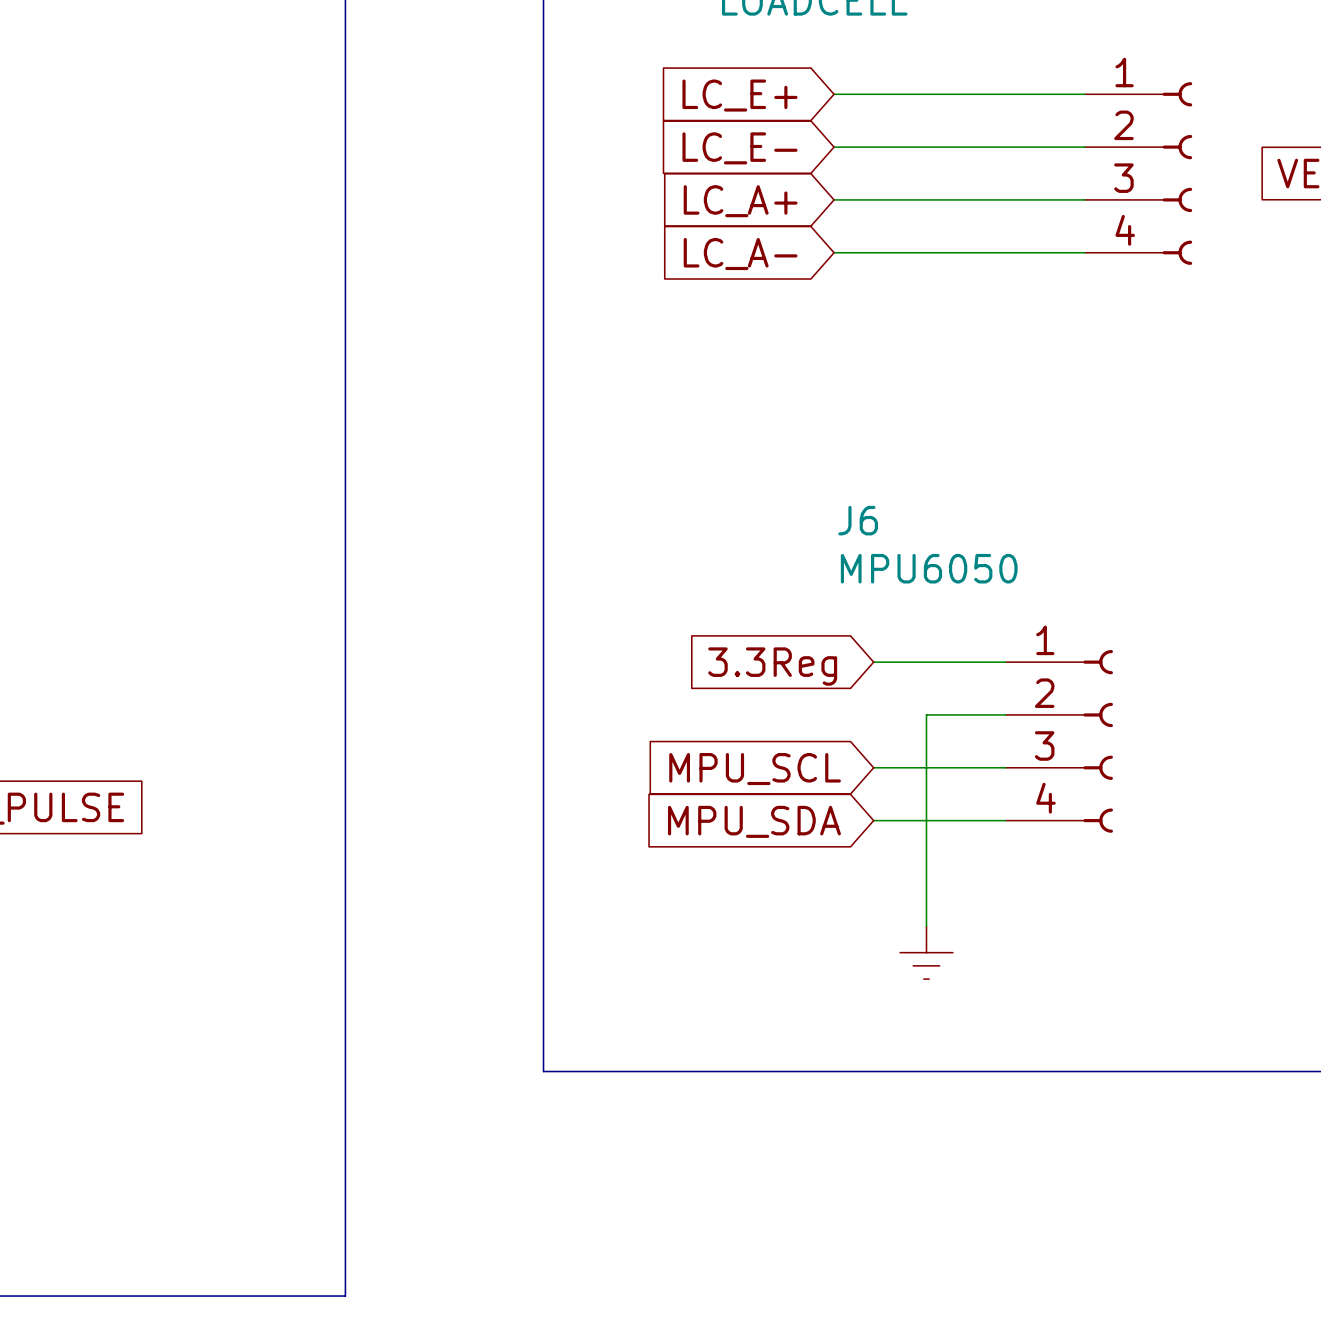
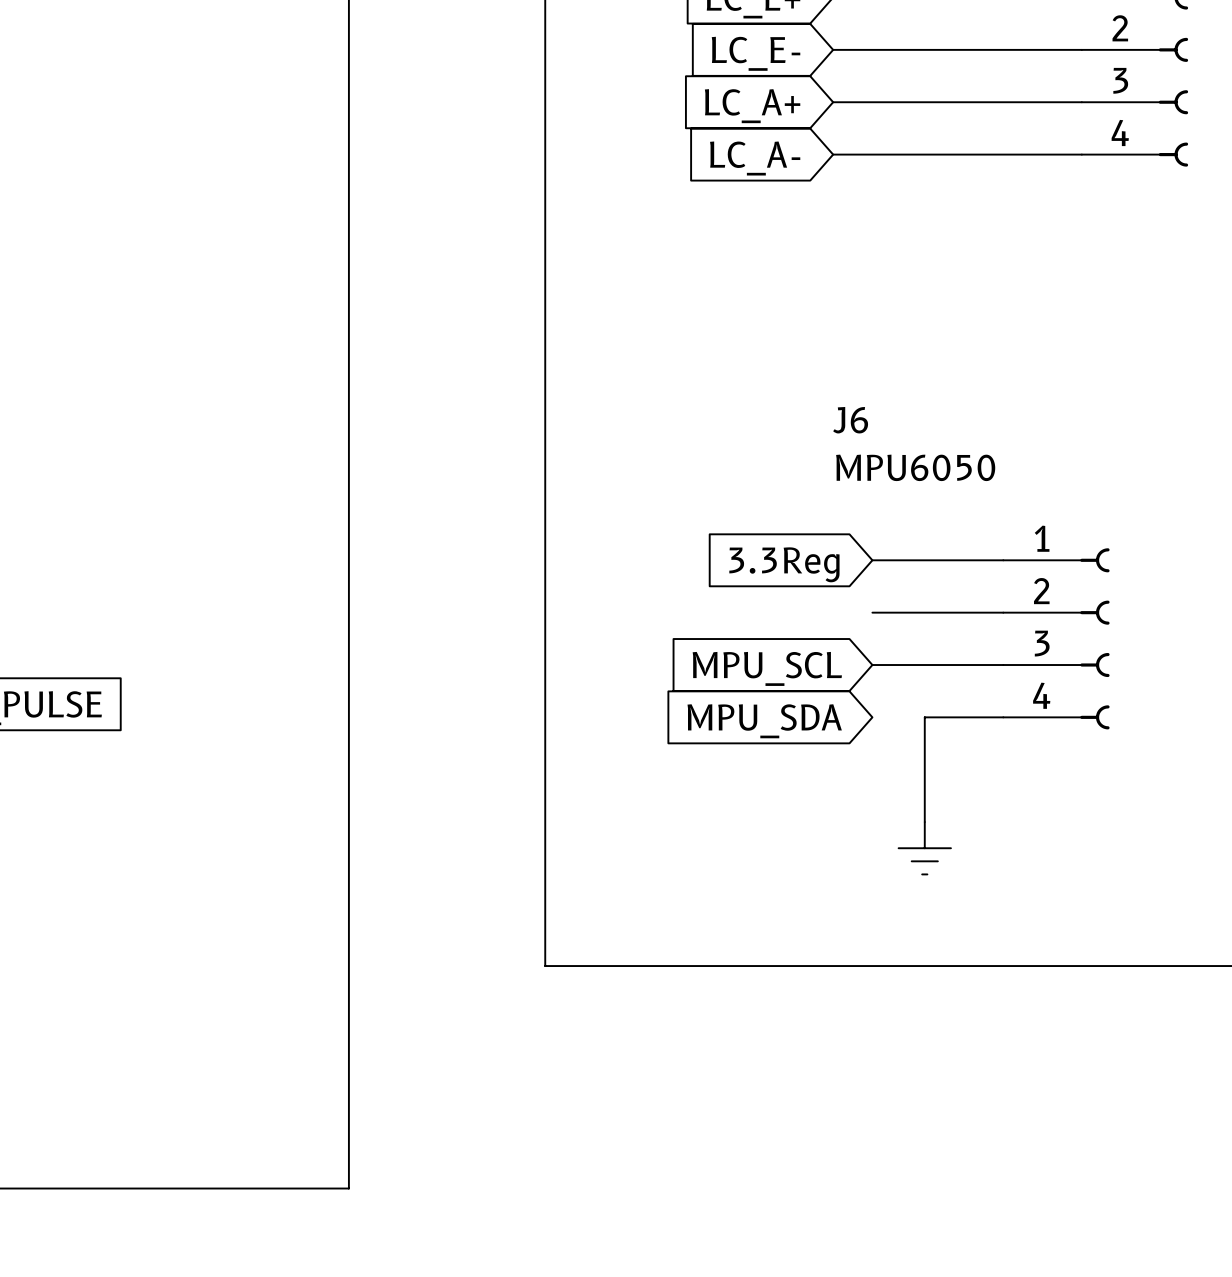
wire: (926, 714) (926, 820) (873, 820) -> (924, 612) (872, 612)

